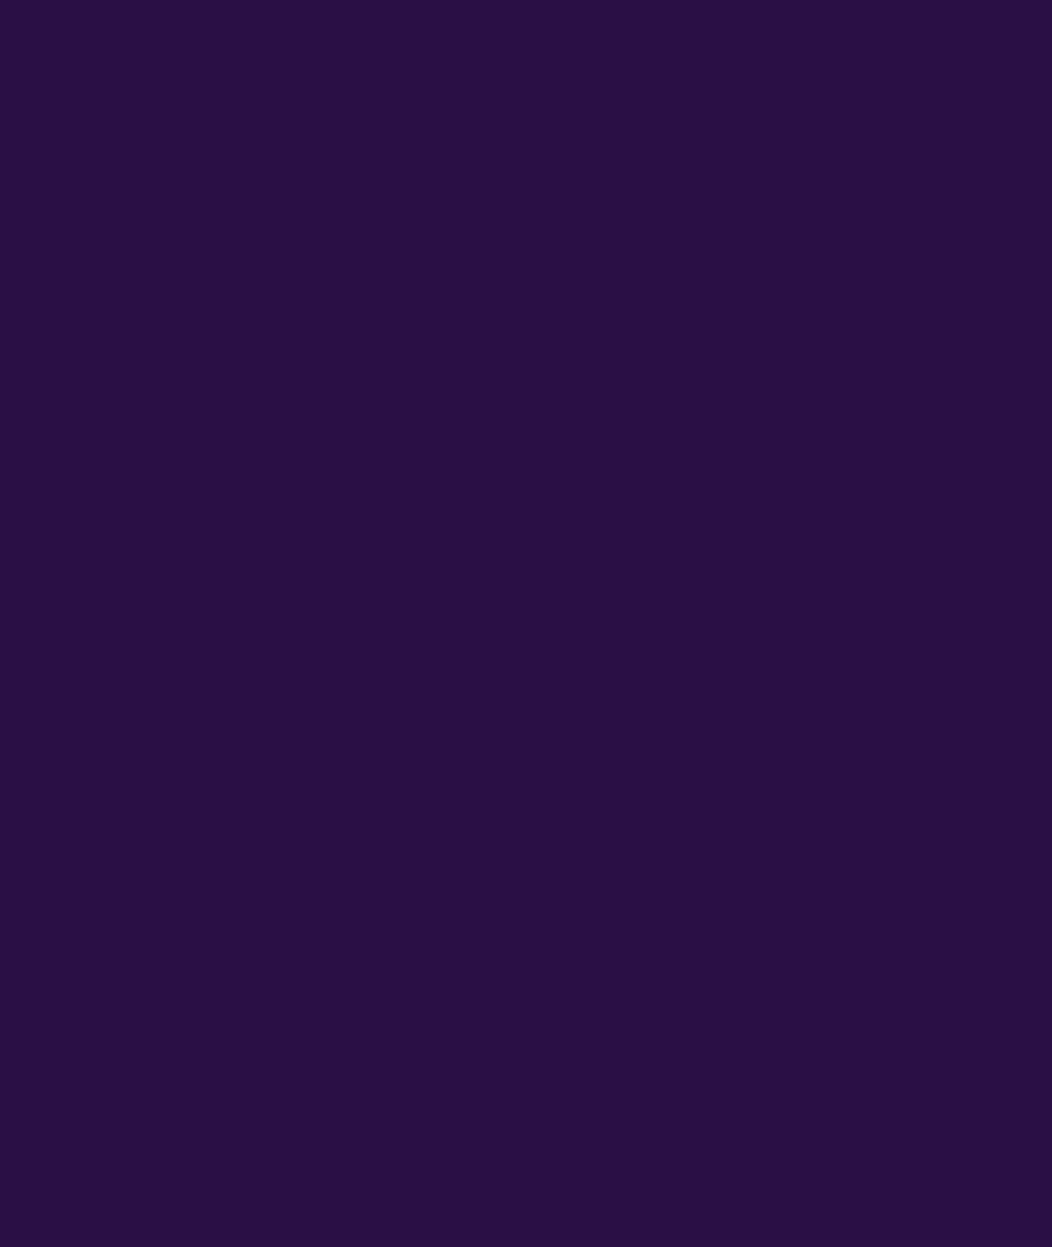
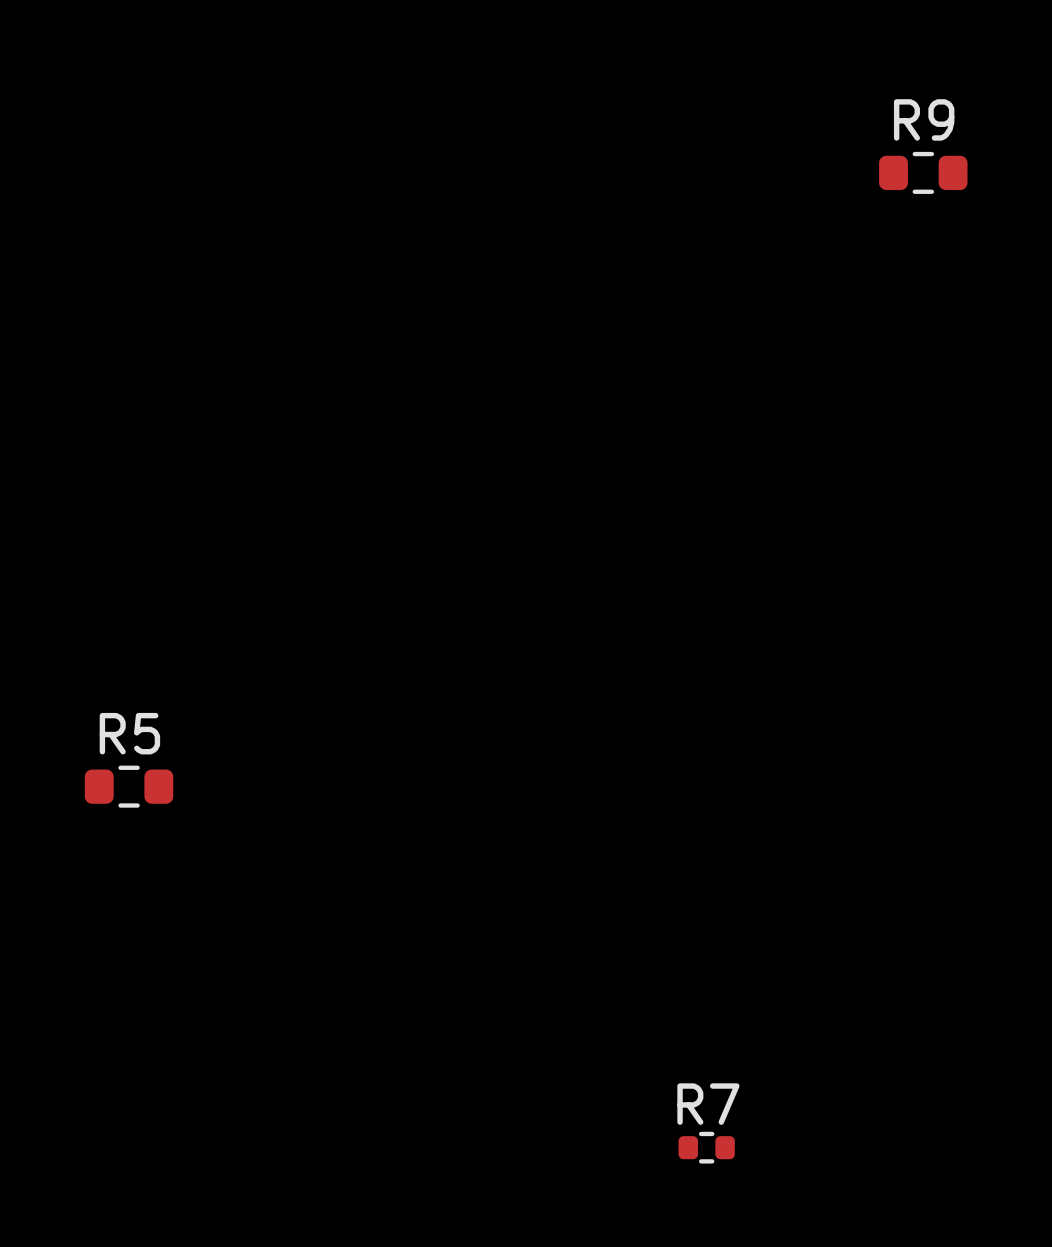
R9: none -> (923, 172)
R5: none -> (129, 786)
R7: none -> (706, 1147)

